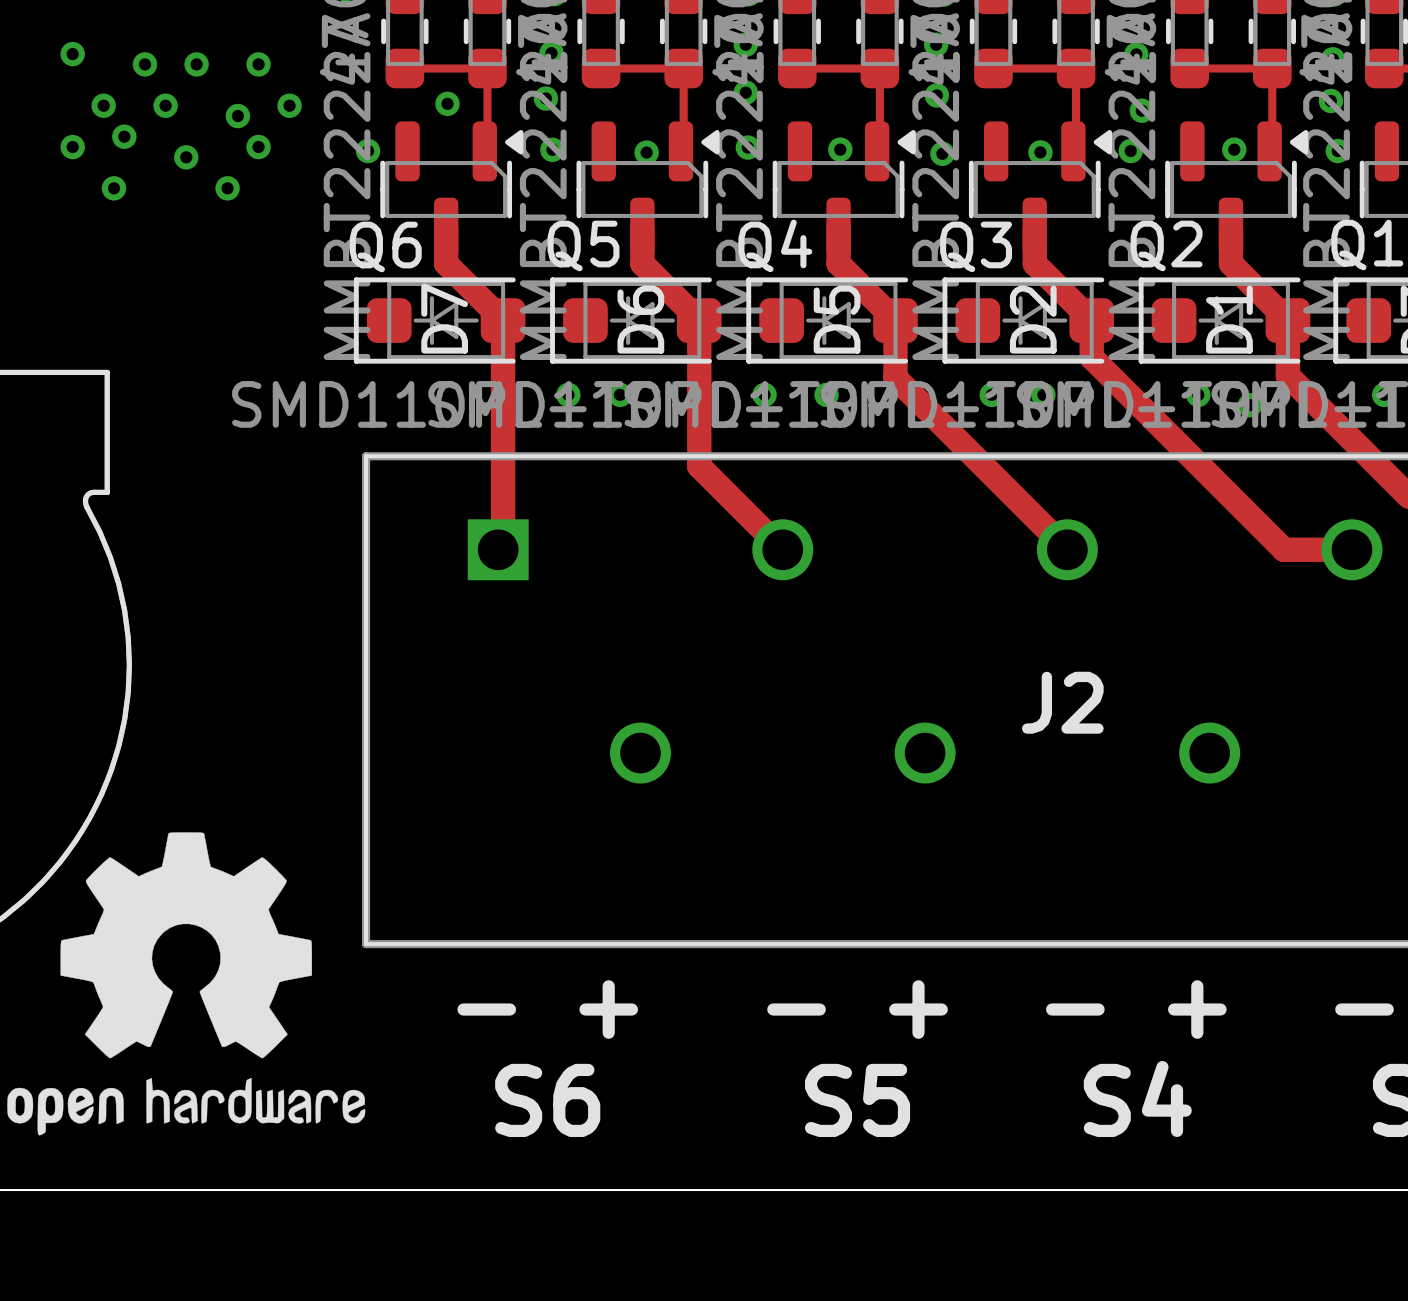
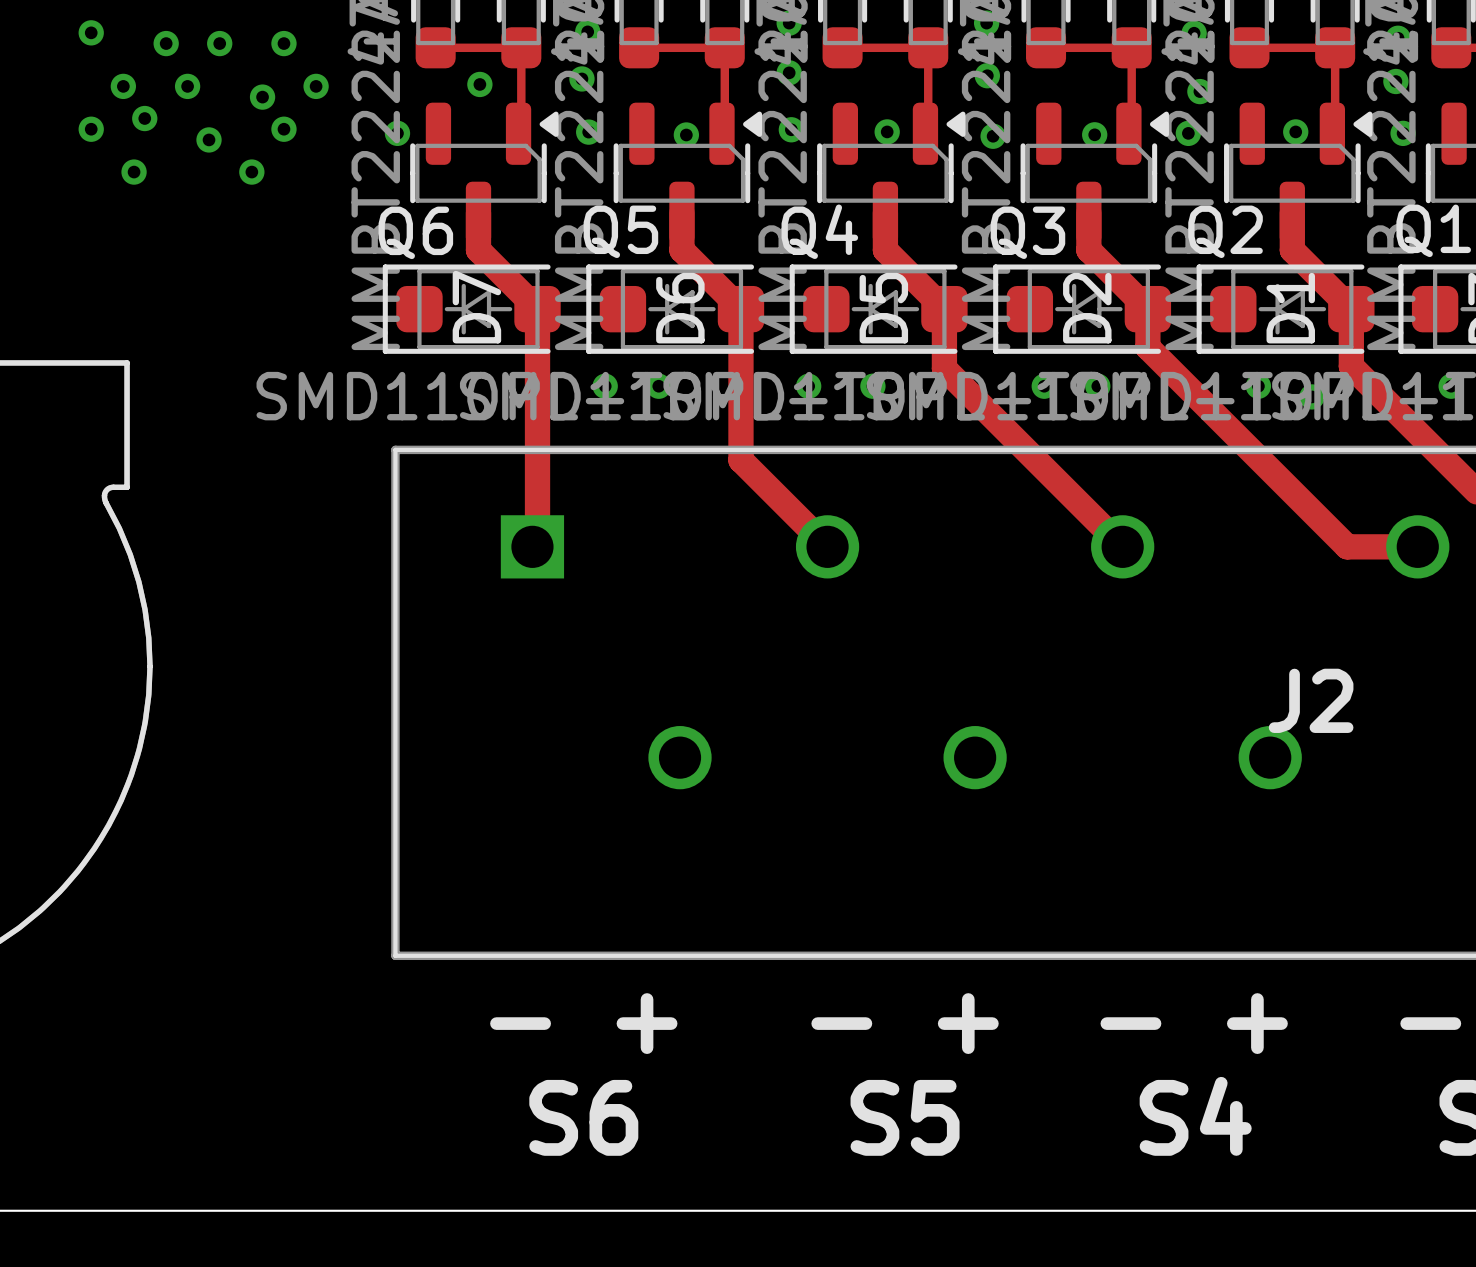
J2 name position: J2 (1062, 702) -> J2 (1311, 700)
drawing: [7, 832, 366, 1136] -> none

